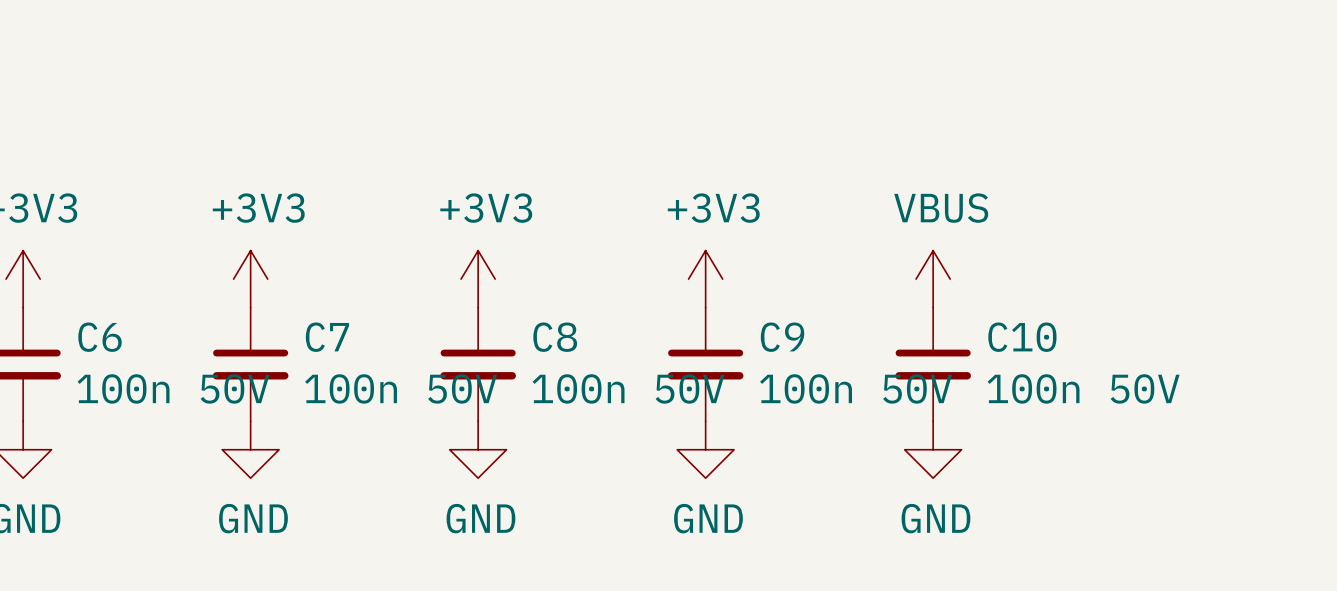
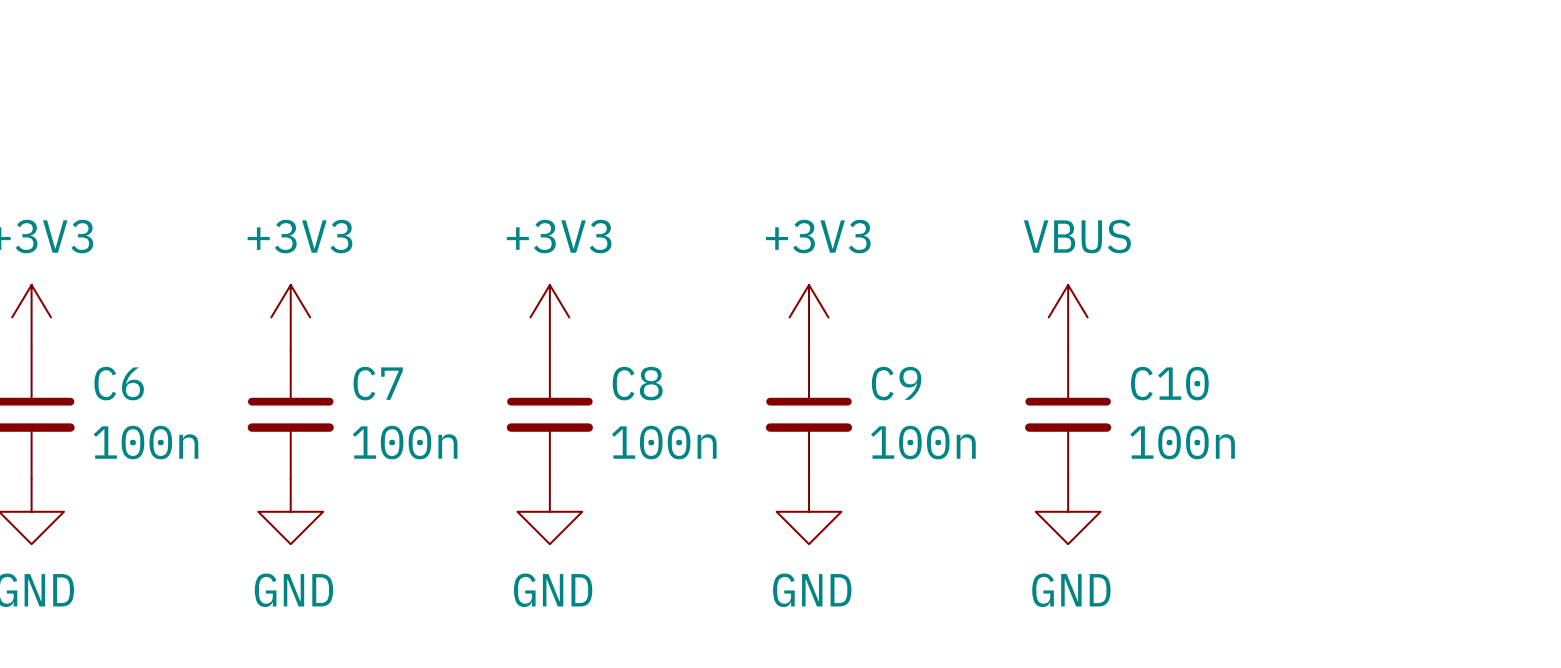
C6 value: 100n 50V (173, 388) -> 100n (145, 442)
C7 value: 100n 50V (401, 388) -> 100n (405, 442)
C8 value: 100n 50V (628, 388) -> 100n (664, 442)
C9 value: 100n 50V (856, 388) -> 100n (923, 442)
C10 value: 100n 50V (1083, 388) -> 100n (1182, 442)

